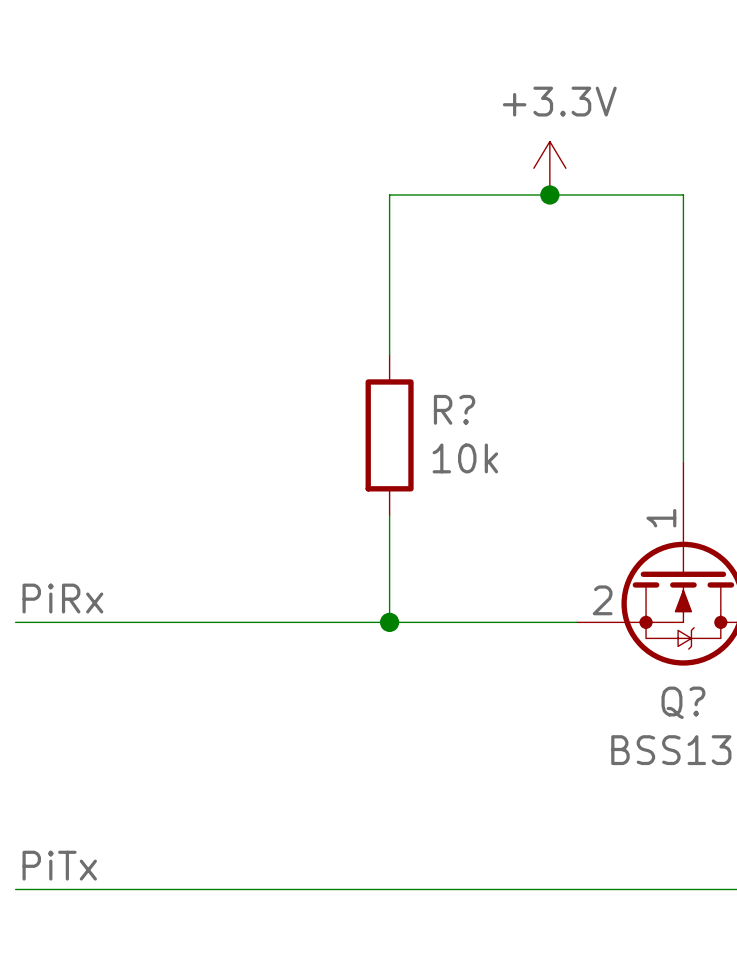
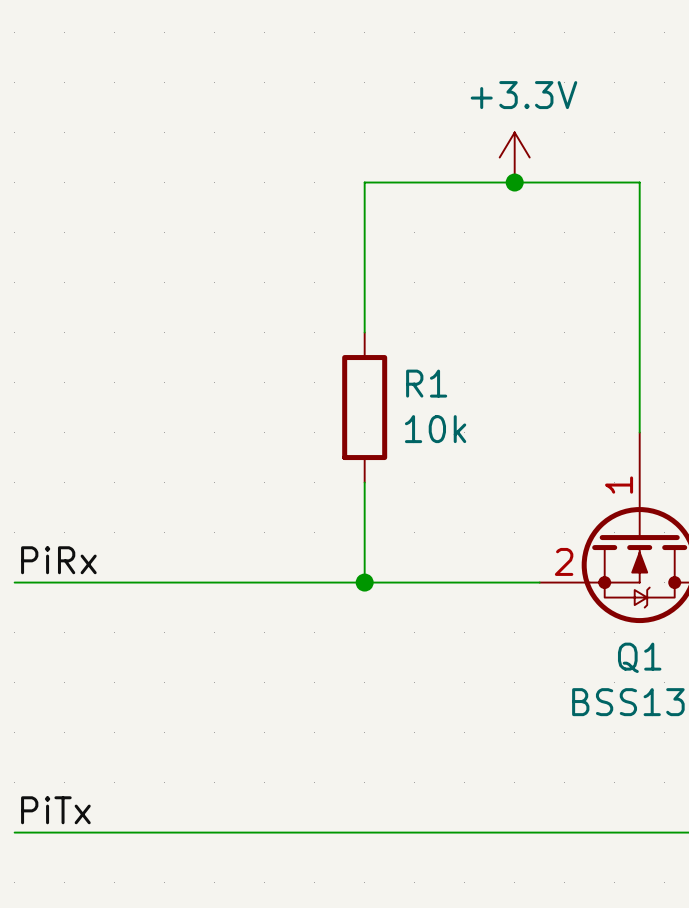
R? name: R? (454, 409) -> R1 (426, 383)
Q? name: Q? (683, 702) -> Q1 (639, 657)

